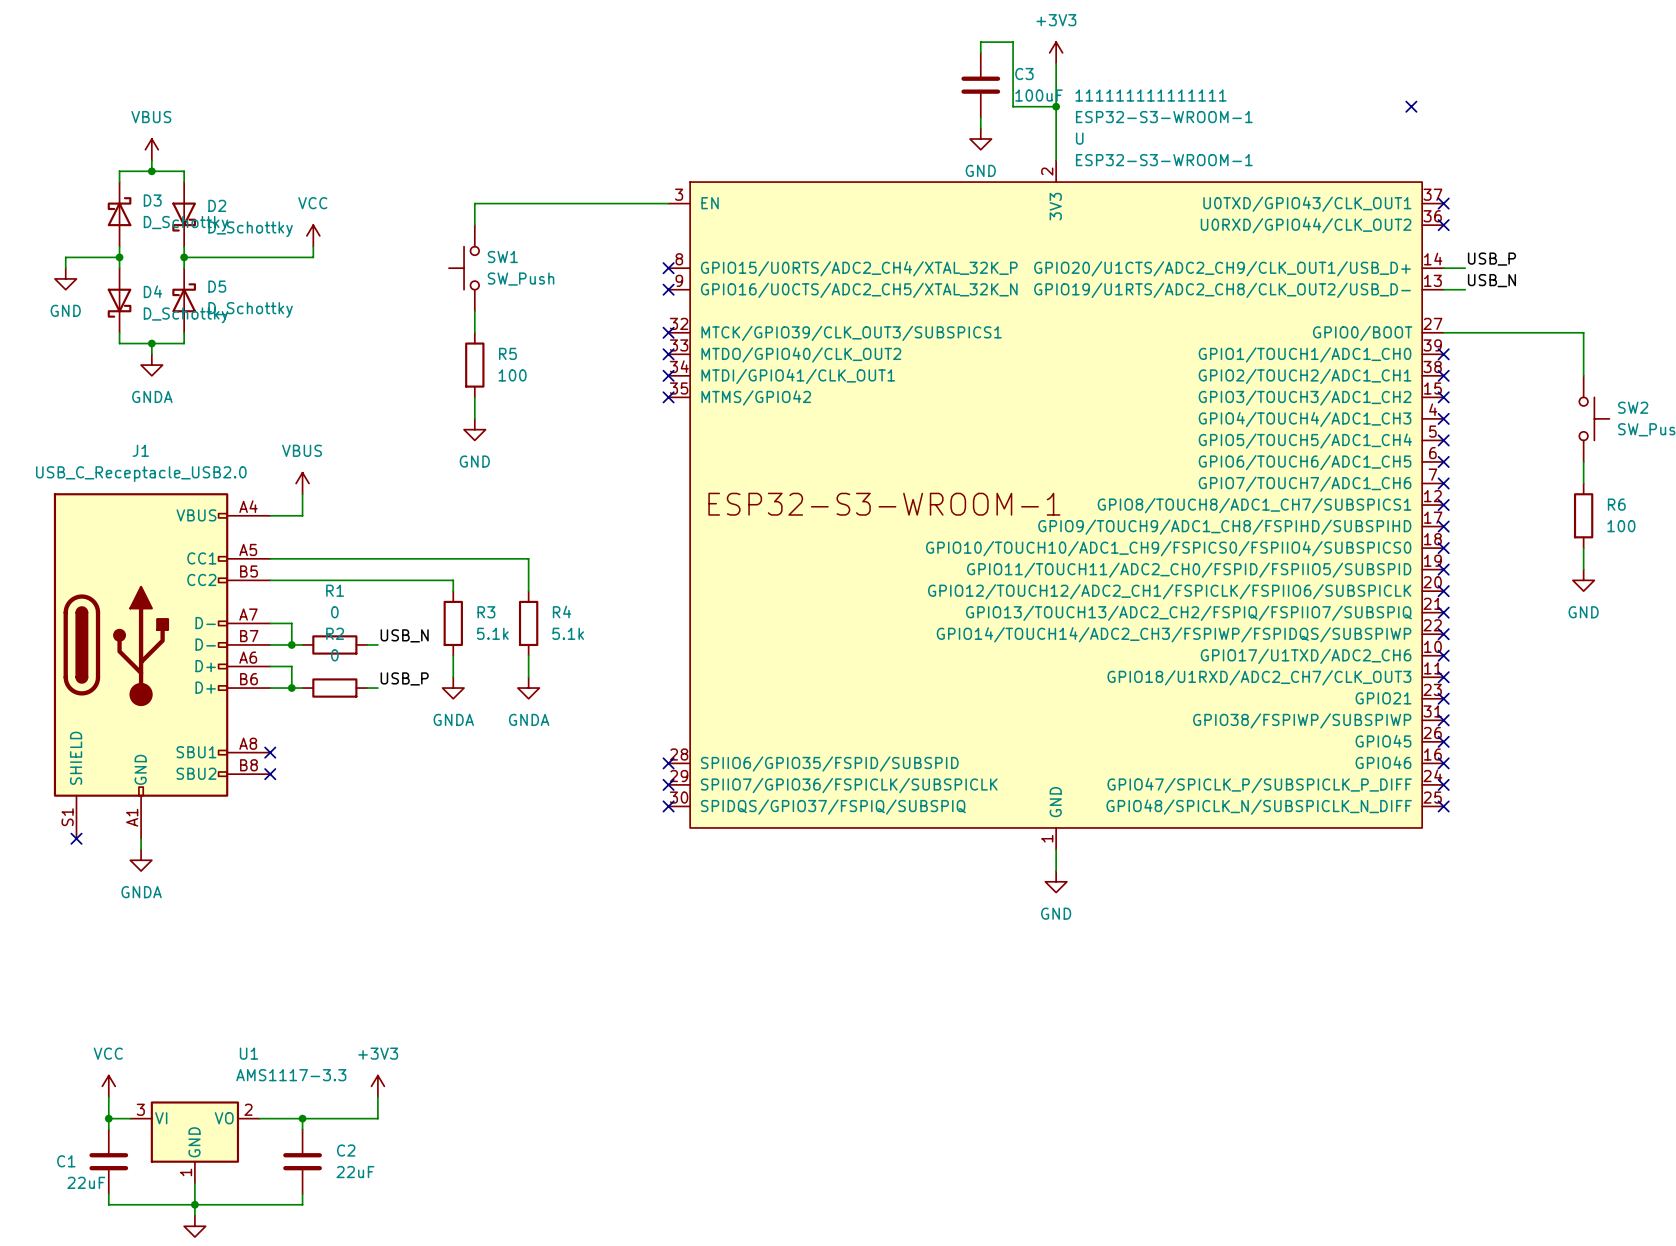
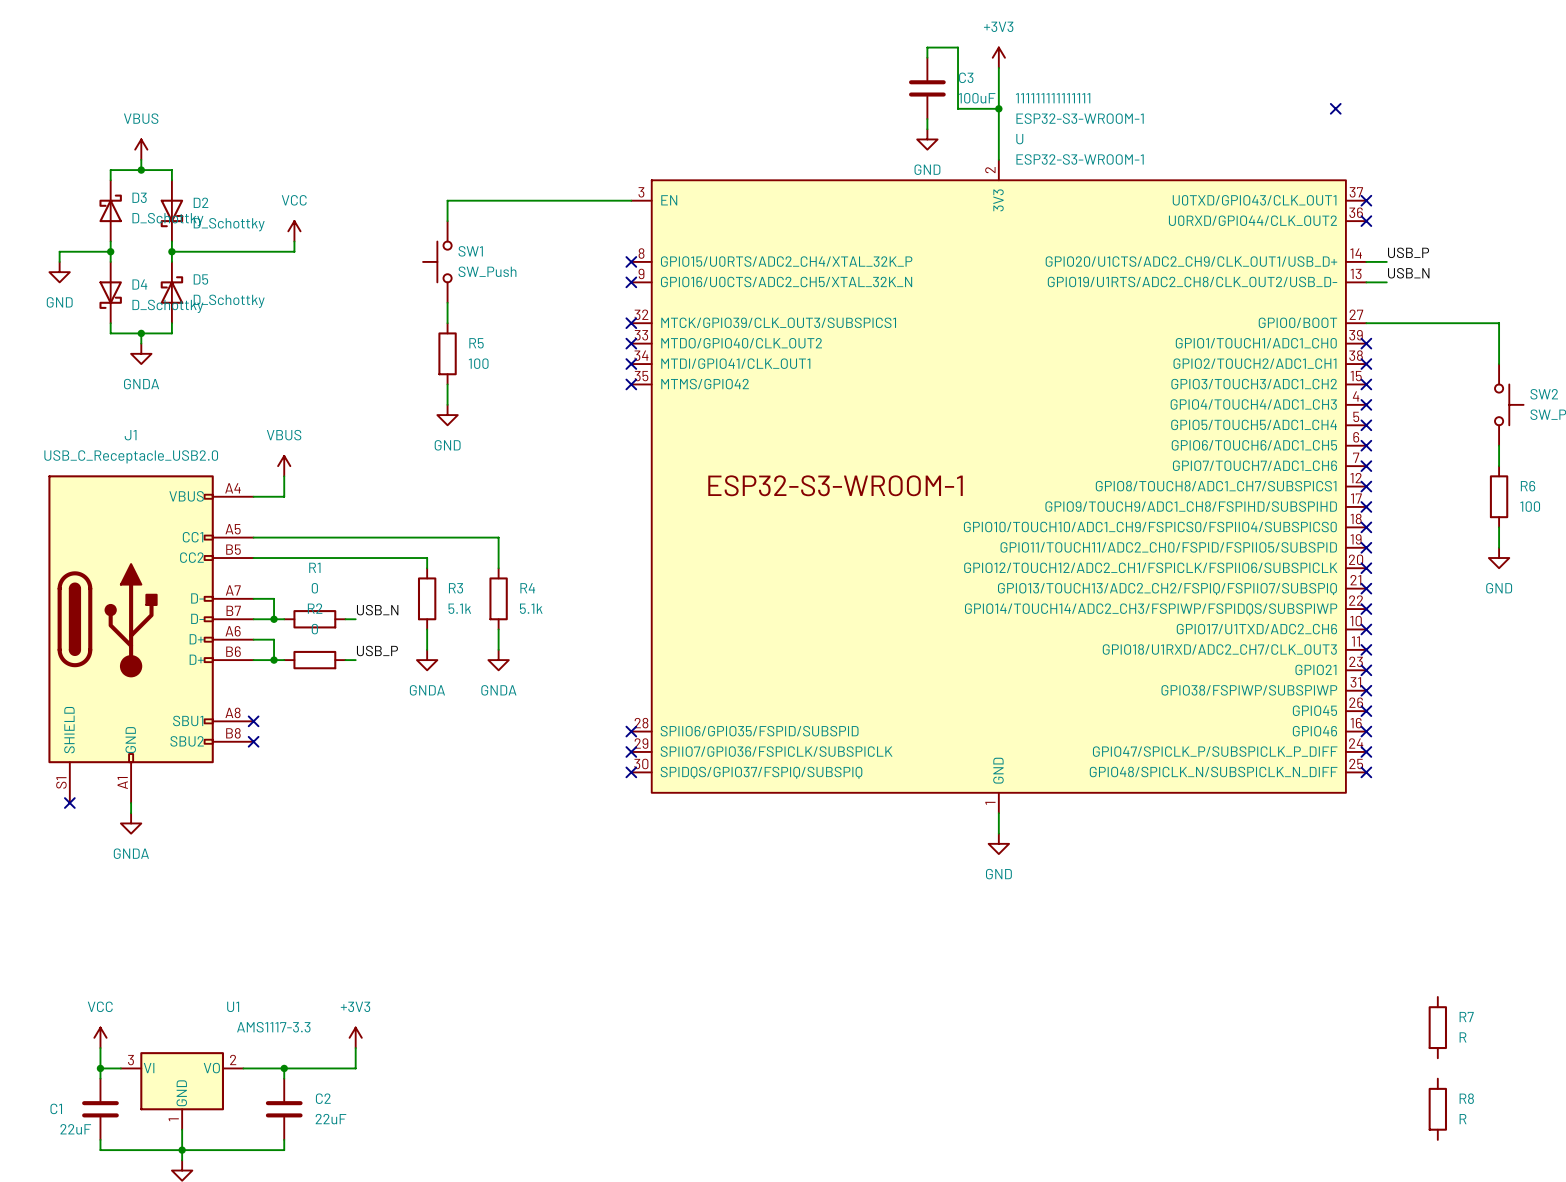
R7: none -> R (1437, 1027)
R8: none -> R (1437, 1109)

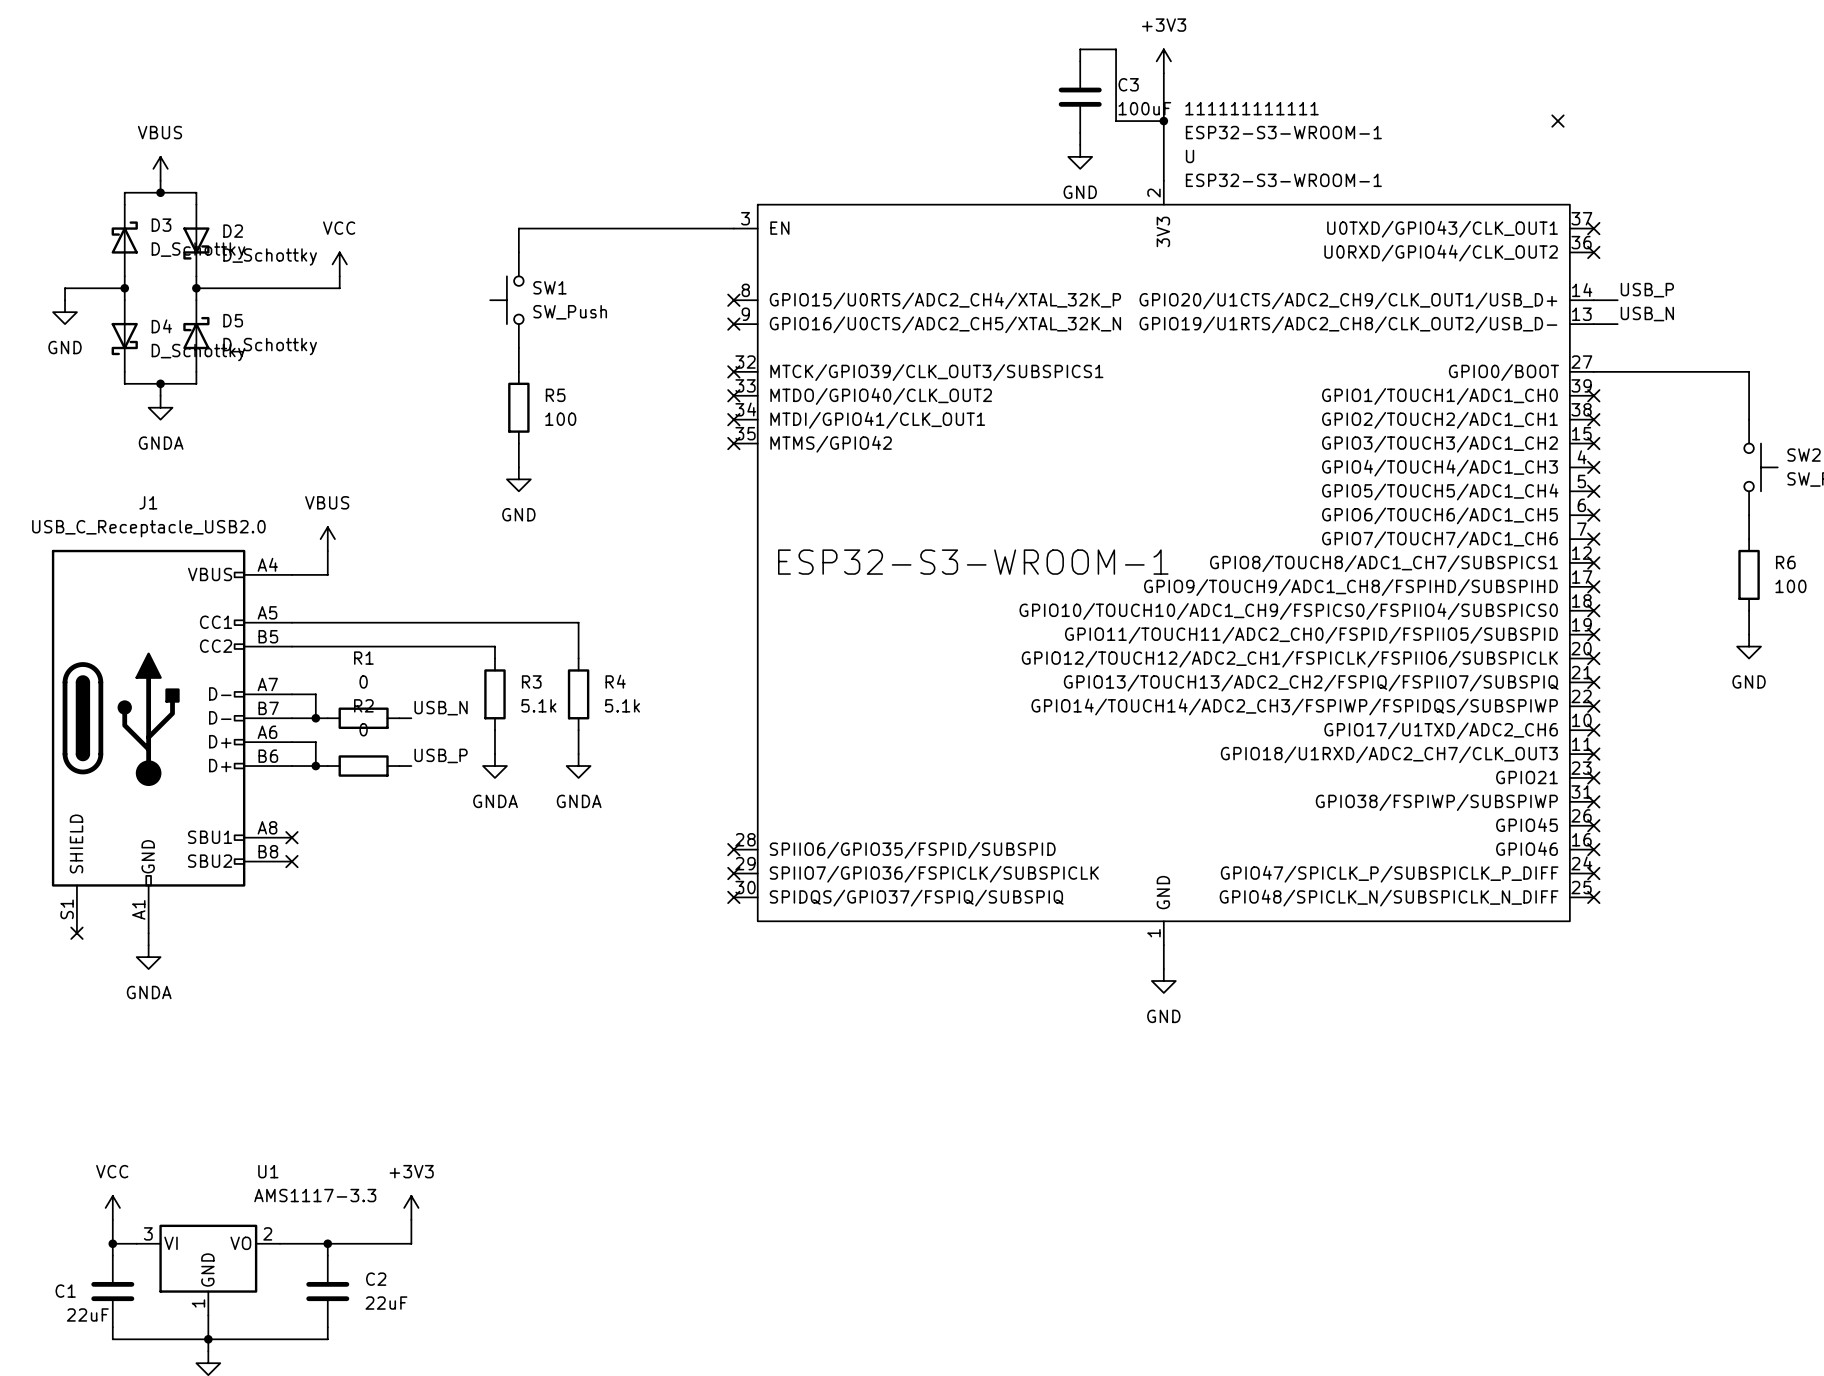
111111111111111 name: 111111111111111 (1053, 98) -> 111111111111 (1252, 108)
R7: R (1437, 1027) -> none
R8: R (1437, 1109) -> none

